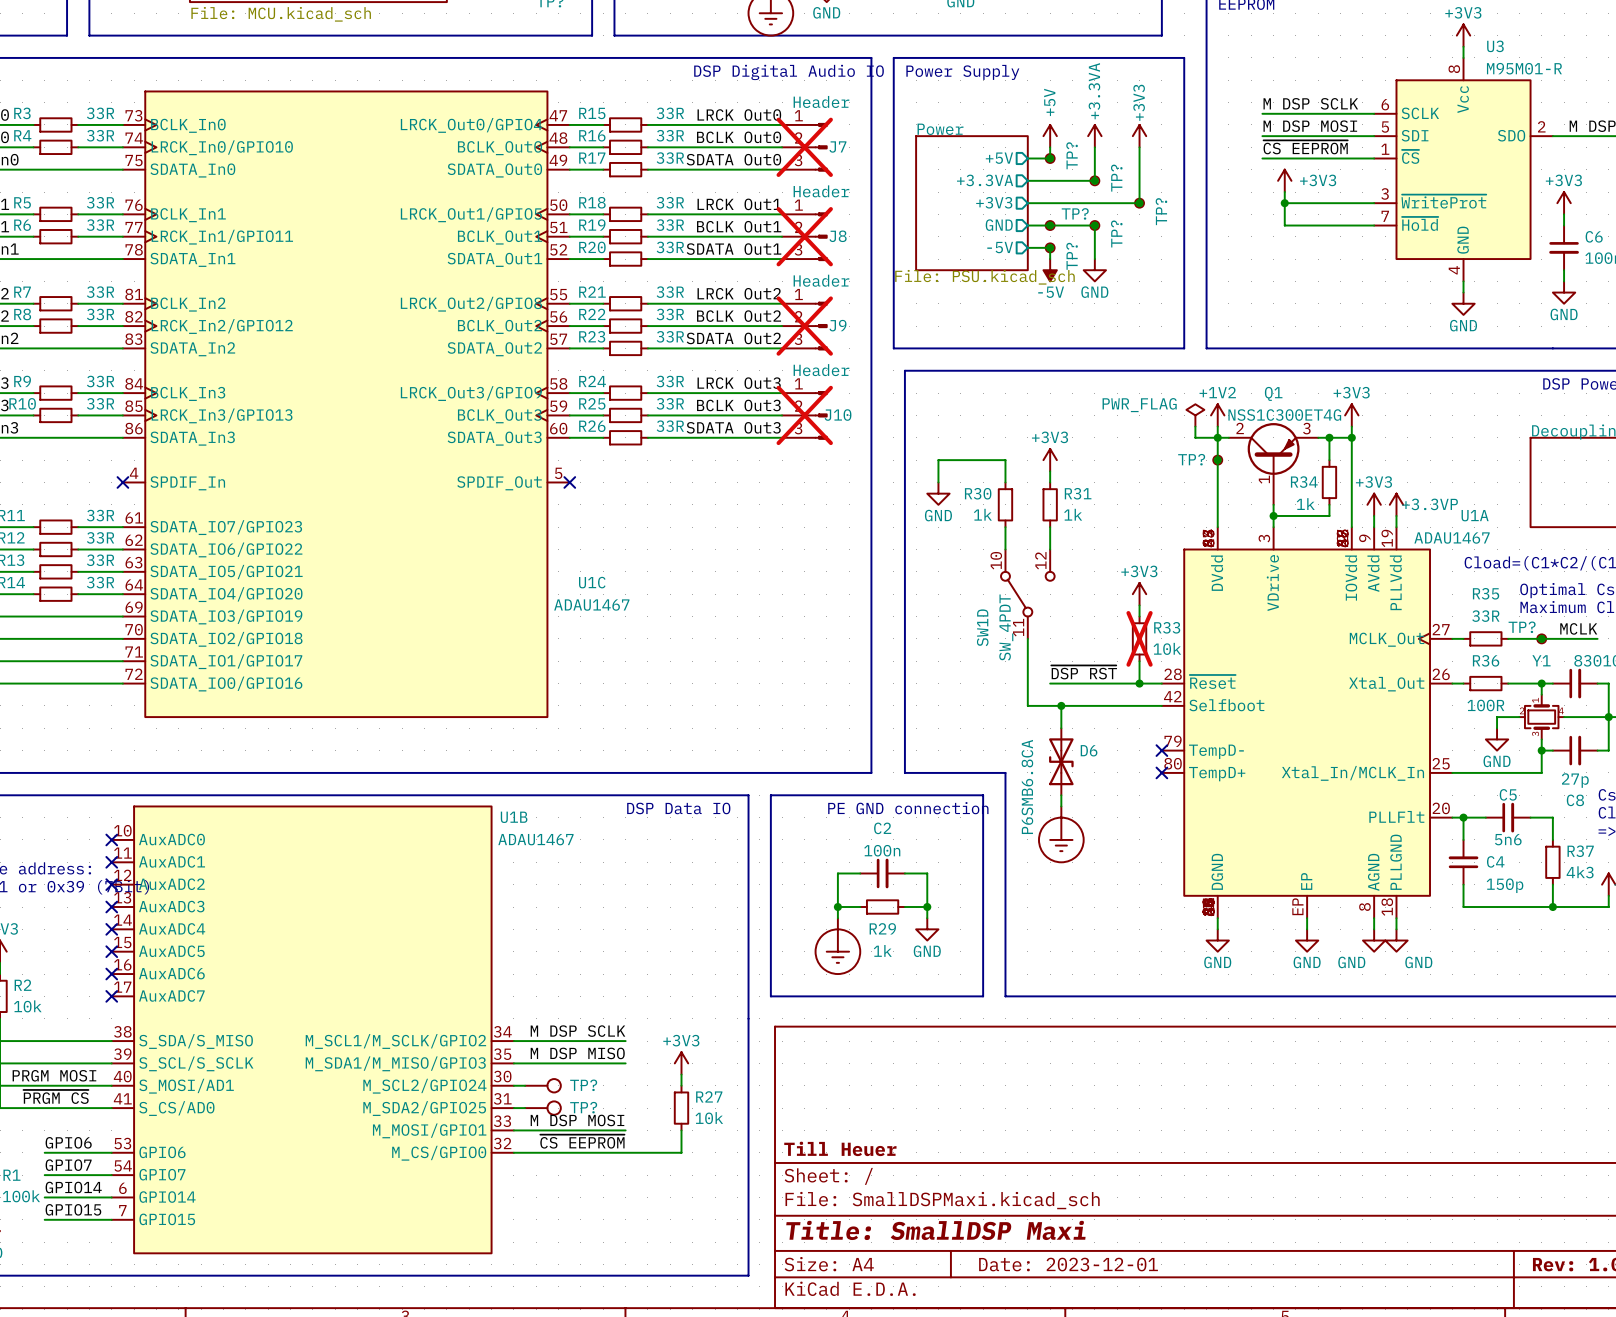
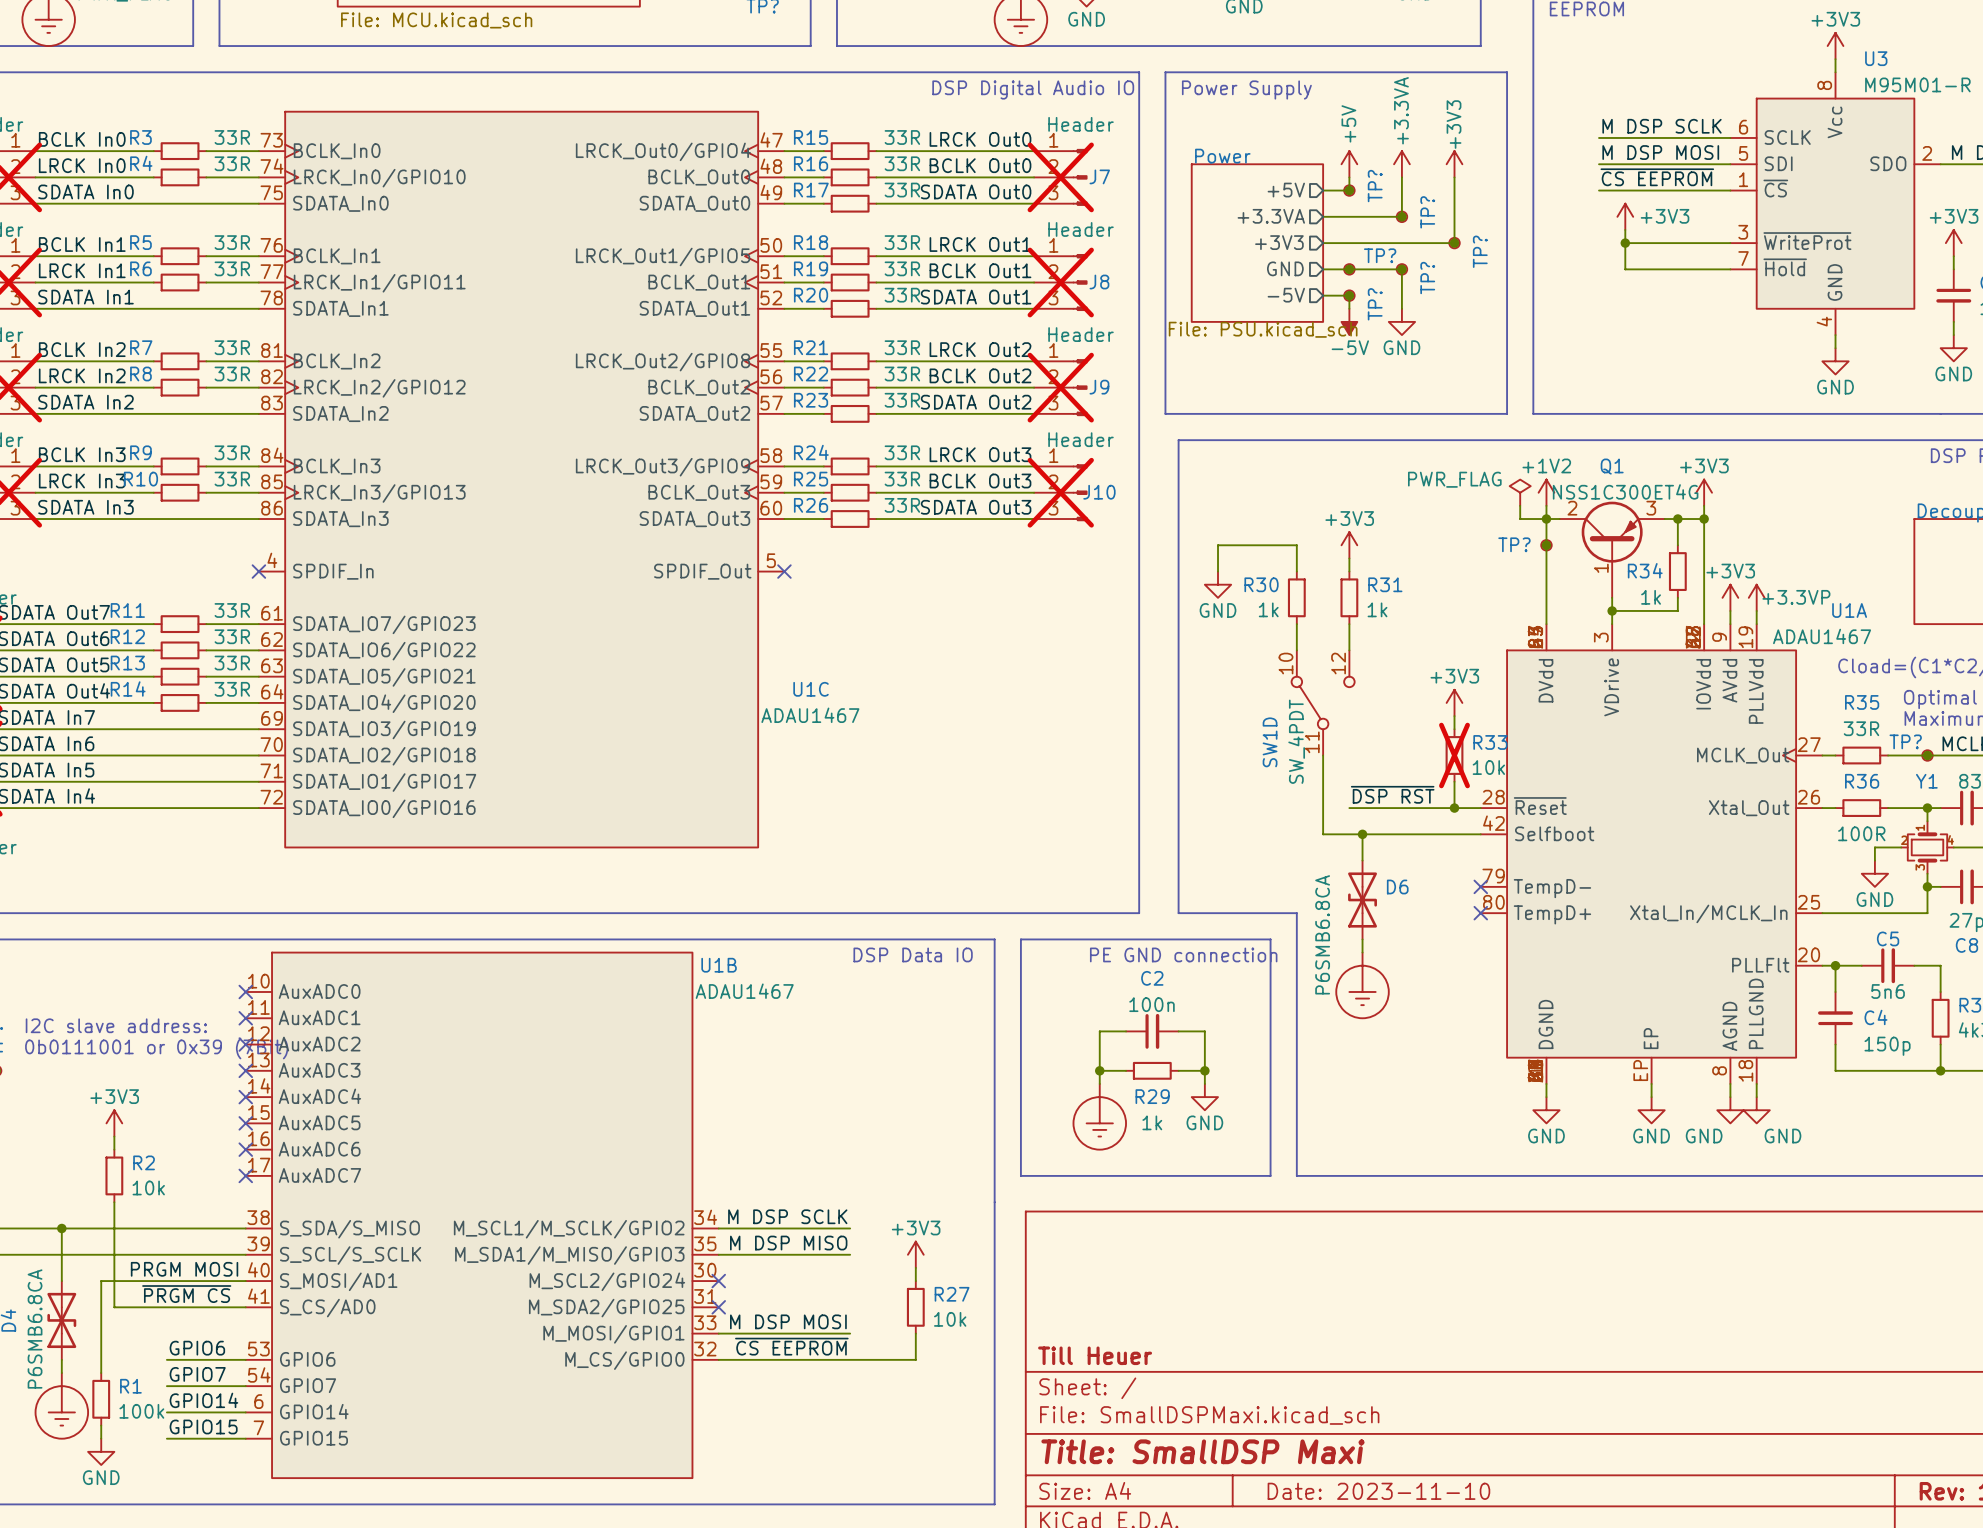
wire: (513, 1085) (525, 1085) -> none
no-connect mark: none -> (718, 1281)
TP?: (542, 1085) -> none
wire: (513, 1108) (525, 1108) -> none
no-connect mark: none -> (718, 1307)
TP?: (542, 1108) -> none
title block: Date: 2023-12-01 (1068, 1264) -> Date: 2023-11-10 (1378, 1491)

